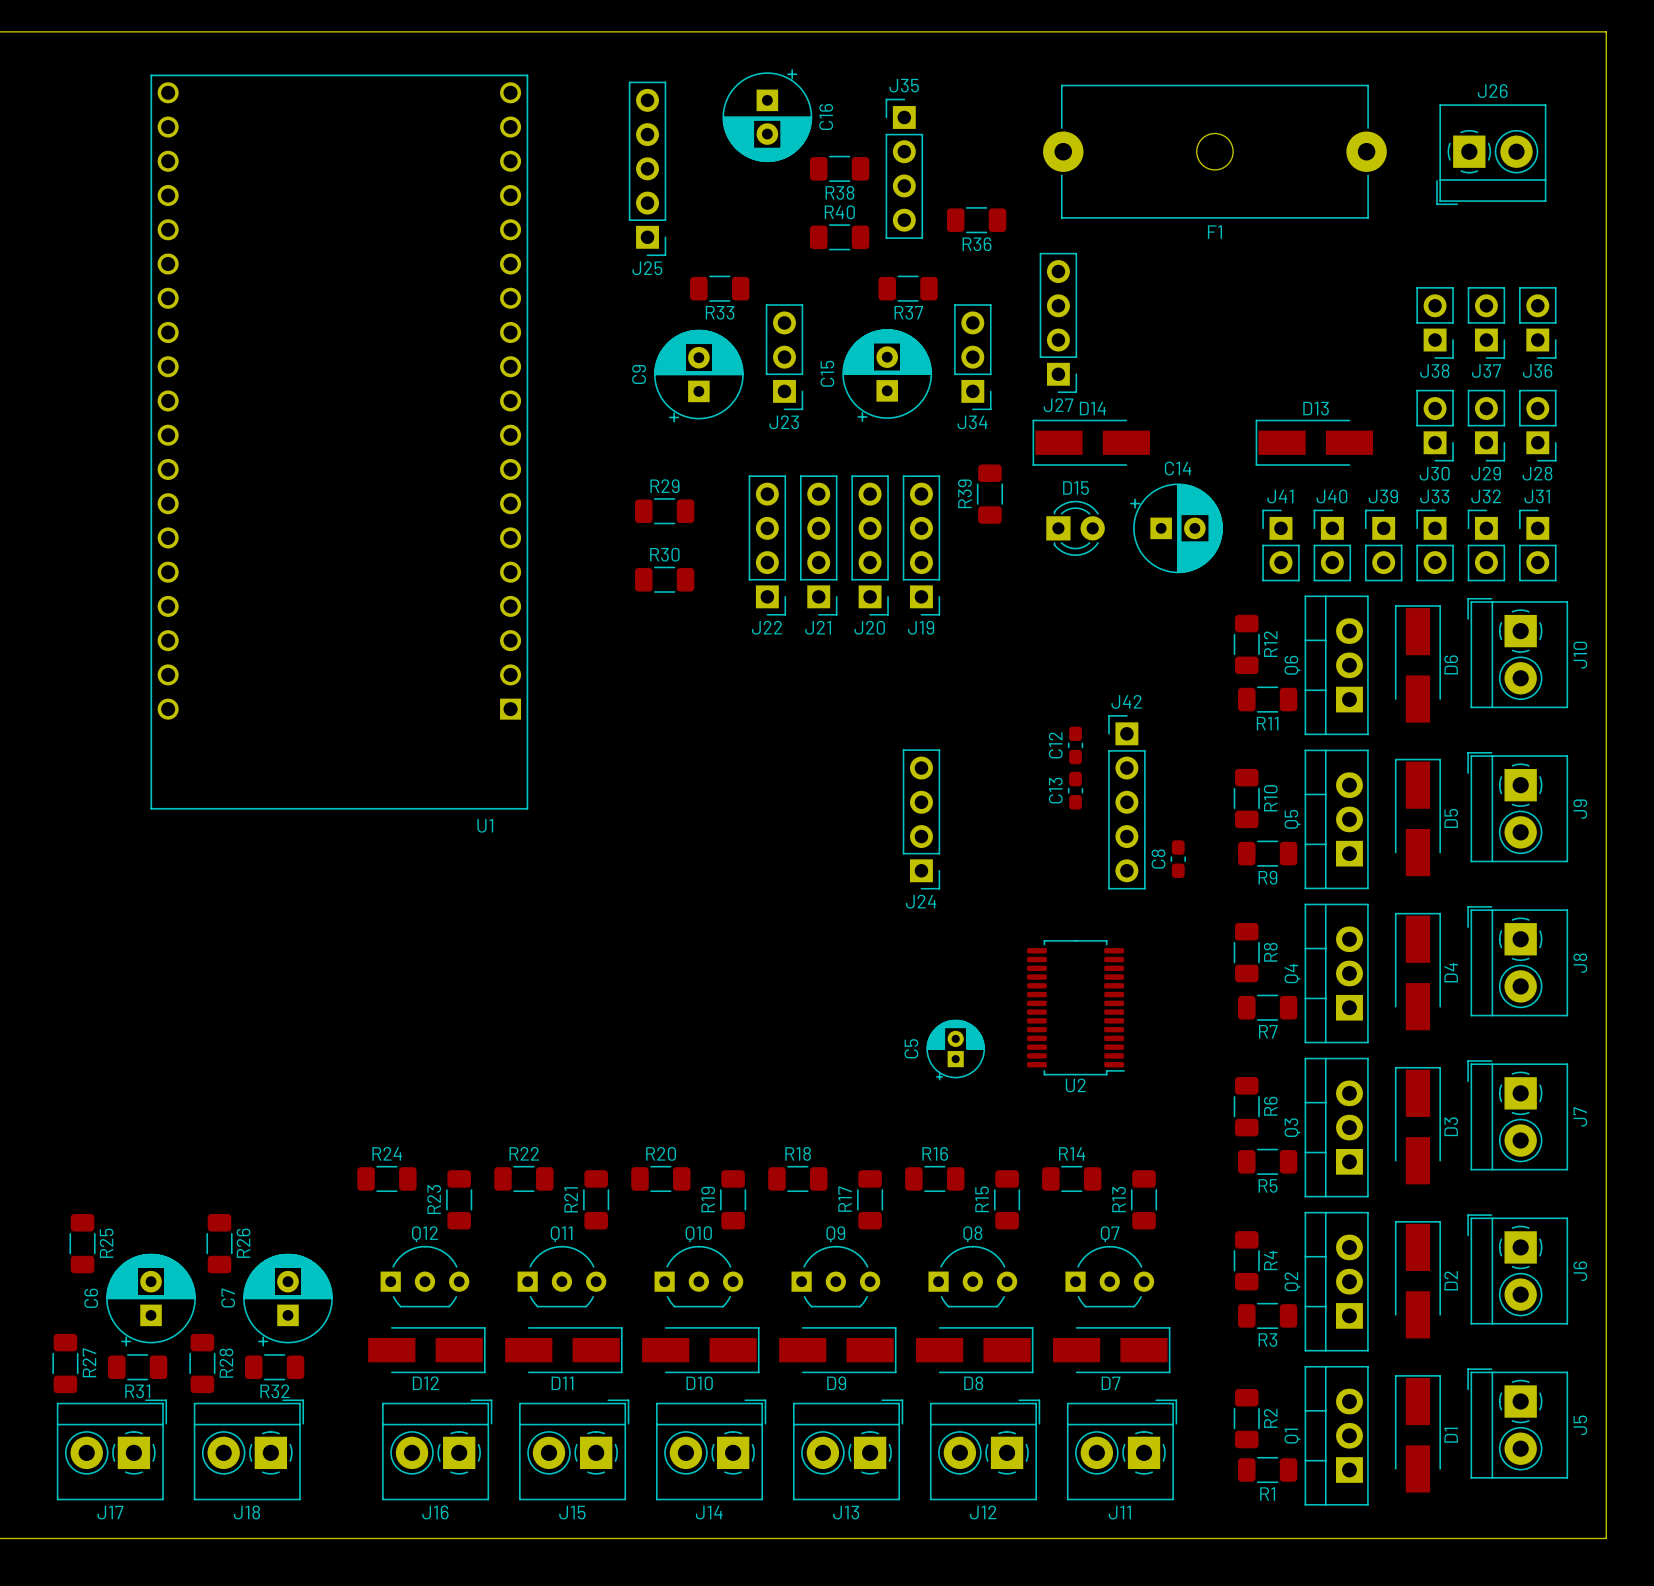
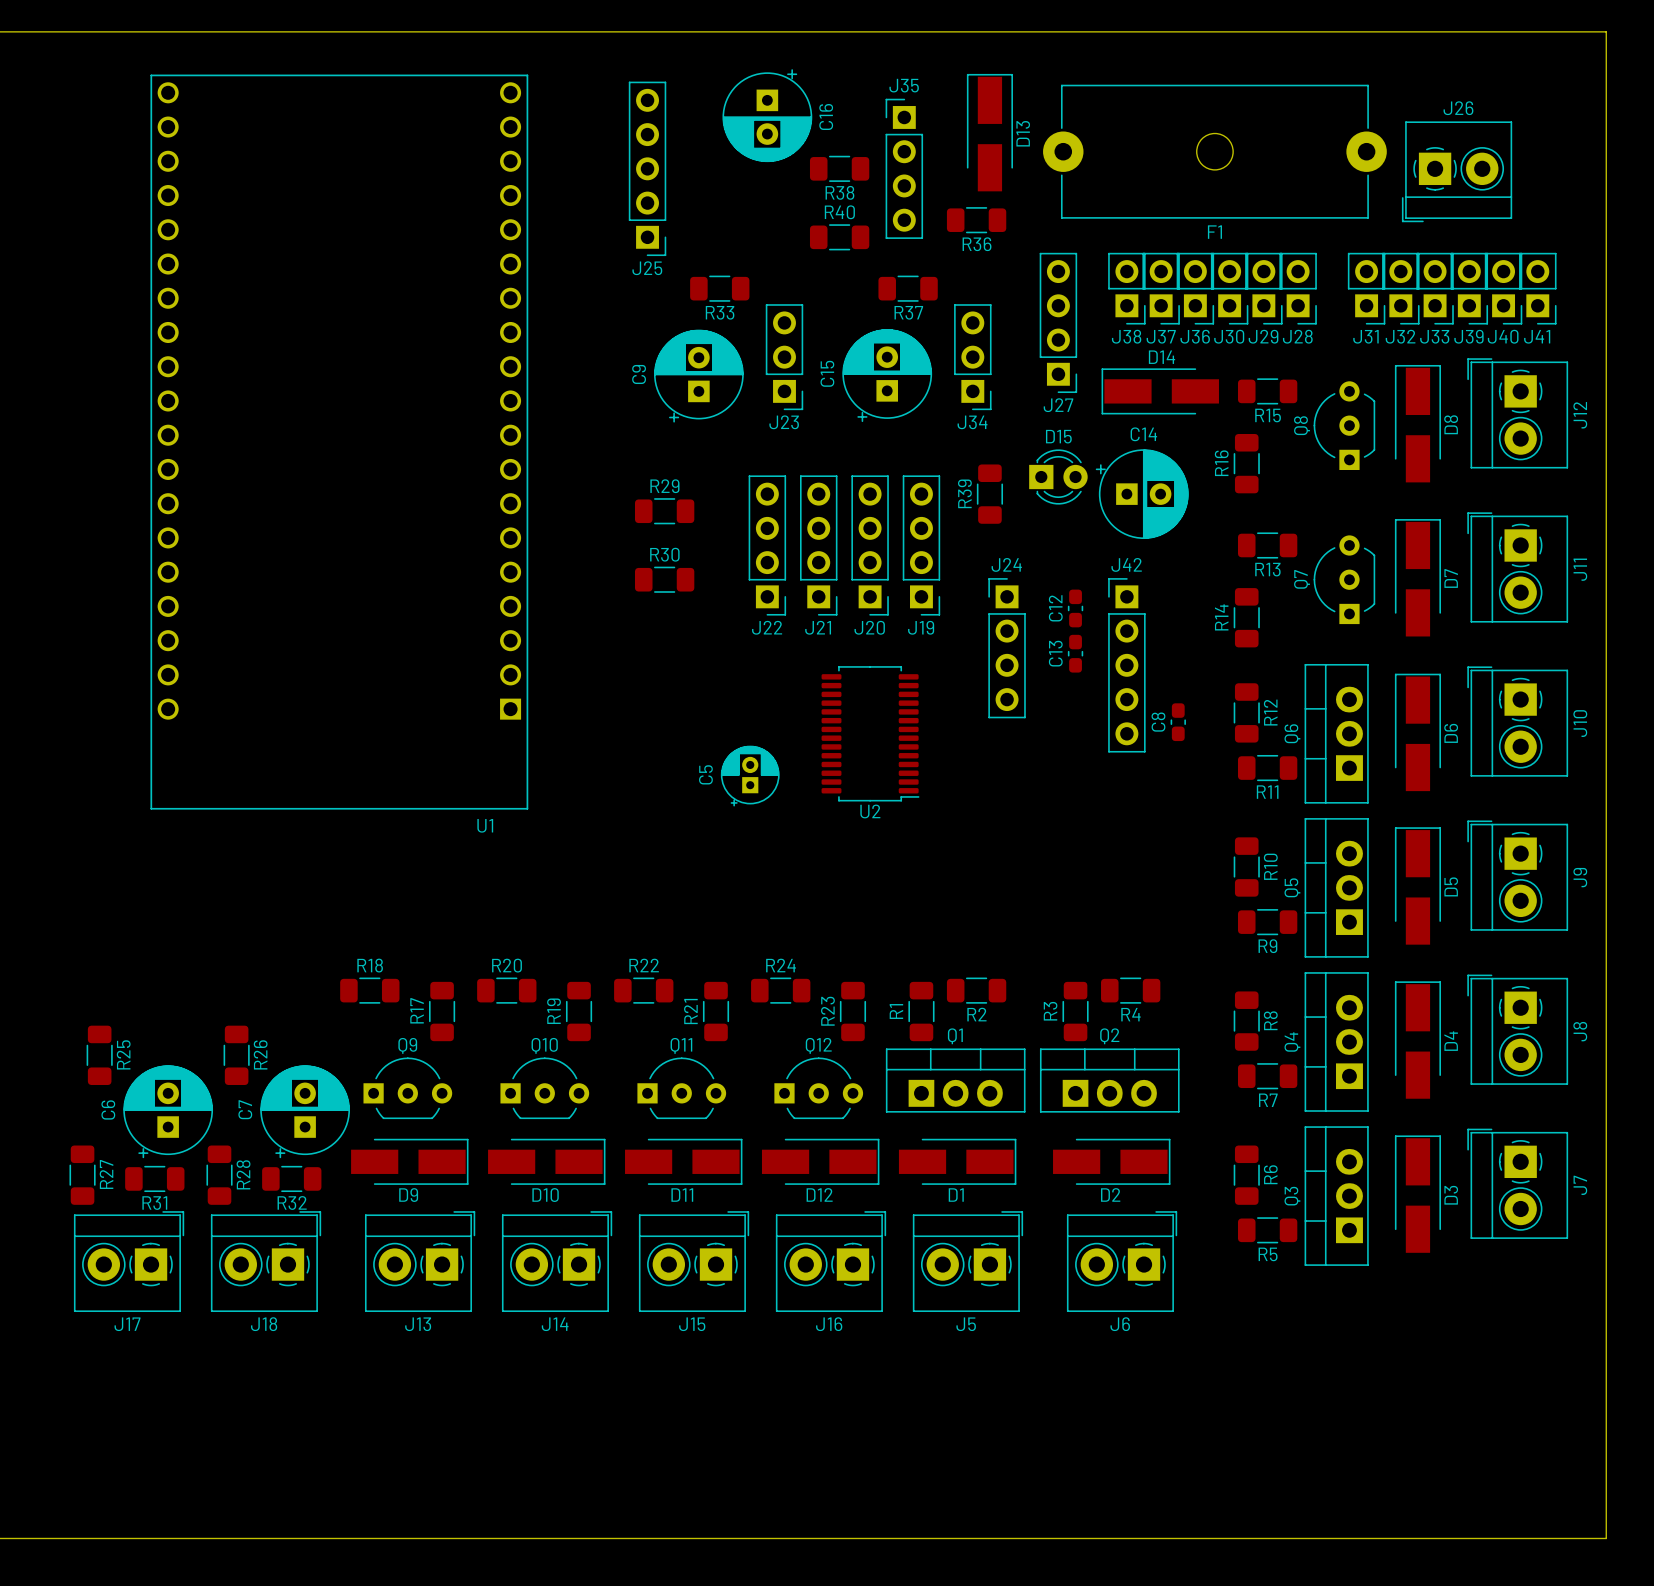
J26 position: (1491, 154) -> (1457, 171)
J38 position: (1435, 322) -> (1126, 288)
J37 position: (1486, 322) -> (1161, 288)
J36 position: (1537, 322) -> (1195, 288)
J30 position: (1435, 425) -> (1229, 288)
J29 position: (1486, 425) -> (1263, 288)
J28 position: (1537, 425) -> (1298, 288)
D14 position: (1091, 442) -> (1160, 391)
D13 rotation: 0° (1314, 442) -> 90° clockwise (989, 132)
D13 position: (1314, 442) -> (989, 132)
D15 position: (1075, 528) -> (1058, 477)
C14 position: (1176, 528) -> (1142, 494)
J41 rotation: 0° (1280, 545) -> 180° (1537, 288)
J41 position: (1280, 545) -> (1537, 288)
J40 rotation: 0° (1332, 545) -> 180° (1503, 288)
J40 position: (1332, 545) -> (1503, 288)
J39 rotation: 0° (1383, 545) -> 180° (1469, 288)
J39 position: (1383, 545) -> (1469, 288)
J33 rotation: 0° (1435, 545) -> 180° (1435, 288)
J33 position: (1435, 545) -> (1435, 288)
J32 rotation: 0° (1486, 545) -> 180° (1400, 288)
J32 position: (1486, 545) -> (1400, 288)
J31 rotation: 0° (1537, 545) -> 180° (1366, 288)
J31 position: (1537, 545) -> (1366, 288)
R12 position: (1246, 644) -> (1246, 712)
J10 position: (1517, 653) -> (1517, 721)
D6 position: (1417, 663) -> (1417, 732)
Q6 position: (1336, 665) -> (1336, 733)
R11 position: (1267, 699) -> (1267, 768)
C12 position: (1075, 745) -> (1075, 608)
C13 position: (1075, 790) -> (1075, 653)
R10 position: (1246, 798) -> (1246, 867)
J42 position: (1126, 802) -> (1126, 665)
J9 position: (1517, 807) -> (1517, 875)
D5 position: (1417, 817) -> (1417, 885)
J24 rotation: 0° (921, 819) -> 180° (1007, 648)
J24 position: (921, 819) -> (1007, 648)
Q5 position: (1336, 819) -> (1336, 887)
R9 position: (1267, 853) -> (1267, 922)
C8 position: (1178, 859) -> (1178, 722)
R8 position: (1246, 952) -> (1246, 1021)
J8 position: (1517, 961) -> (1517, 1029)
D4 position: (1417, 971) -> (1417, 1040)
Q4 position: (1336, 973) -> (1336, 1041)
U2 position: (1075, 1007) -> (870, 733)
R7 position: (1267, 1007) -> (1267, 1076)
C5 position: (955, 1050) -> (750, 776)
R6 position: (1246, 1106) -> (1246, 1175)
J7 position: (1517, 1115) -> (1517, 1183)
D3 position: (1417, 1125) -> (1417, 1194)
Q3 position: (1336, 1127) -> (1336, 1196)
R16 name position: R16 (935, 1153) -> R16 (1221, 463)
R14 name position: R14 (1072, 1153) -> R14 (1221, 617)
R5 position: (1267, 1161) -> (1267, 1230)
R24 position: (386, 1178) -> (780, 990)
R22 position: (523, 1178) -> (643, 990)
R20 position: (660, 1178) -> (506, 990)
R18 position: (797, 1178) -> (369, 990)
R16 rotation: 0° (934, 1178) -> 90° clockwise (1246, 463)
R16 position: (934, 1178) -> (1246, 463)
R14 rotation: 0° (1071, 1178) -> 90° clockwise (1246, 617)
R14 position: (1071, 1178) -> (1246, 617)
R23 position: (459, 1199) -> (852, 1011)
R21 position: (596, 1199) -> (716, 1011)
R19 position: (733, 1199) -> (579, 1011)
R17 position: (870, 1199) -> (442, 1011)
R15 name position: R15 (982, 1199) -> R15 (1268, 415)
R15 rotation: 0° (1007, 1199) -> 90° clockwise (1267, 391)
R15 position: (1007, 1199) -> (1267, 391)
R13 name position: R13 (1119, 1199) -> R13 (1267, 569)
R13 rotation: 0° (1144, 1199) -> 90° clockwise (1267, 545)
R13 position: (1144, 1199) -> (1267, 545)
R25 position: (82, 1243) -> (99, 1055)
R26 position: (219, 1243) -> (236, 1055)
R4 rotation: 0° (1246, 1260) -> 90° clockwise (1130, 990)
R4 position: (1246, 1260) -> (1130, 990)
J6 rotation: 0° (1517, 1269) -> 90° clockwise (1122, 1261)
J6 position: (1517, 1269) -> (1122, 1261)
Q12 position: (424, 1276) -> (818, 1088)
Q11 position: (561, 1276) -> (681, 1088)
Q10 position: (698, 1276) -> (544, 1088)
Q9 position: (835, 1276) -> (407, 1088)
Q8 rotation: 0° (972, 1276) -> 90° counterclockwise (1344, 425)
Q8 position: (972, 1276) -> (1344, 425)
Q7 rotation: 0° (1109, 1276) -> 90° counterclockwise (1344, 579)
Q7 position: (1109, 1276) -> (1344, 579)
D2 rotation: 0° (1417, 1279) -> 90° clockwise (1111, 1161)
D2 position: (1417, 1279) -> (1111, 1161)
Q2 rotation: 0° (1336, 1281) -> 90° clockwise (1109, 1080)
Q2 position: (1336, 1281) -> (1109, 1080)
C6 position: (151, 1300) -> (168, 1111)
C7 position: (287, 1300) -> (305, 1111)
R3 rotation: 0° (1267, 1315) -> 90° clockwise (1075, 1011)
R3 position: (1267, 1315) -> (1075, 1011)
D12 position: (426, 1350) -> (820, 1161)
D11 position: (563, 1350) -> (683, 1161)
D10 position: (700, 1350) -> (546, 1161)
D9 position: (837, 1350) -> (409, 1161)
D8 rotation: 0° (974, 1350) -> 90° counterclockwise (1417, 423)
D8 position: (974, 1350) -> (1417, 423)
D7 rotation: 0° (1111, 1350) -> 90° counterclockwise (1417, 577)
D7 position: (1111, 1350) -> (1417, 577)
R27 position: (65, 1363) -> (82, 1175)
R28 position: (202, 1363) -> (219, 1175)
R31 position: (137, 1367) -> (154, 1178)
R32 position: (274, 1367) -> (291, 1178)
R2 rotation: 0° (1246, 1418) -> 90° clockwise (976, 990)
R2 position: (1246, 1418) -> (976, 990)
J5 rotation: 0° (1517, 1423) -> 90° clockwise (967, 1261)
J5 position: (1517, 1423) -> (967, 1261)
D1 rotation: 0° (1417, 1433) -> 90° clockwise (957, 1161)
D1 position: (1417, 1433) -> (957, 1161)
Q1 rotation: 0° (1336, 1435) -> 90° clockwise (955, 1080)
Q1 position: (1336, 1435) -> (955, 1080)
J17 position: (111, 1449) -> (129, 1261)
J18 position: (248, 1449) -> (266, 1261)
J16 position: (437, 1449) -> (831, 1261)
J15 position: (574, 1449) -> (694, 1261)
J14 position: (711, 1449) -> (557, 1261)
J13 position: (848, 1449) -> (420, 1261)
J12 rotation: 0° (985, 1449) -> 90° counterclockwise (1517, 413)
J12 position: (985, 1449) -> (1517, 413)
J11 rotation: 0° (1122, 1449) -> 90° counterclockwise (1517, 567)
J11 position: (1122, 1449) -> (1517, 567)
R1 rotation: 0° (1267, 1470) -> 90° clockwise (921, 1011)
R1 position: (1267, 1470) -> (921, 1011)

